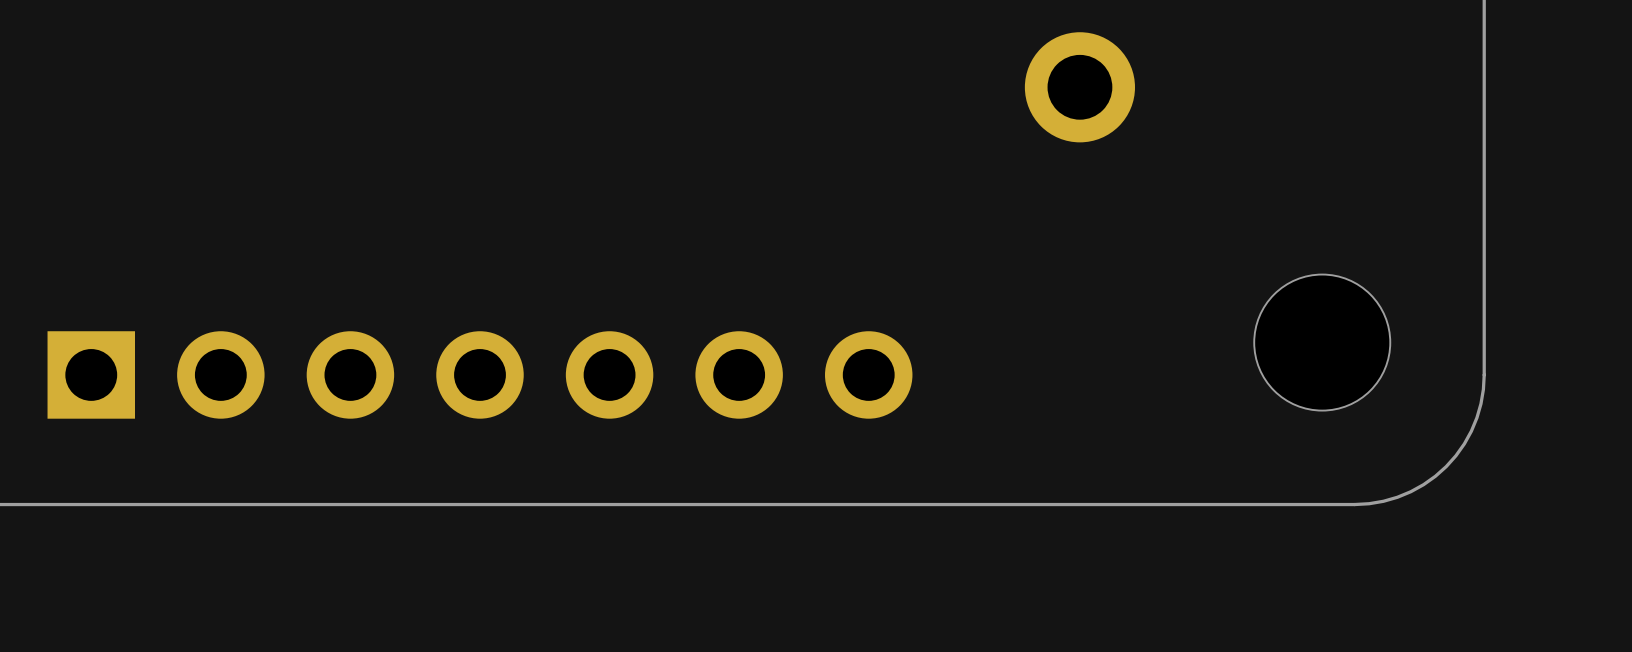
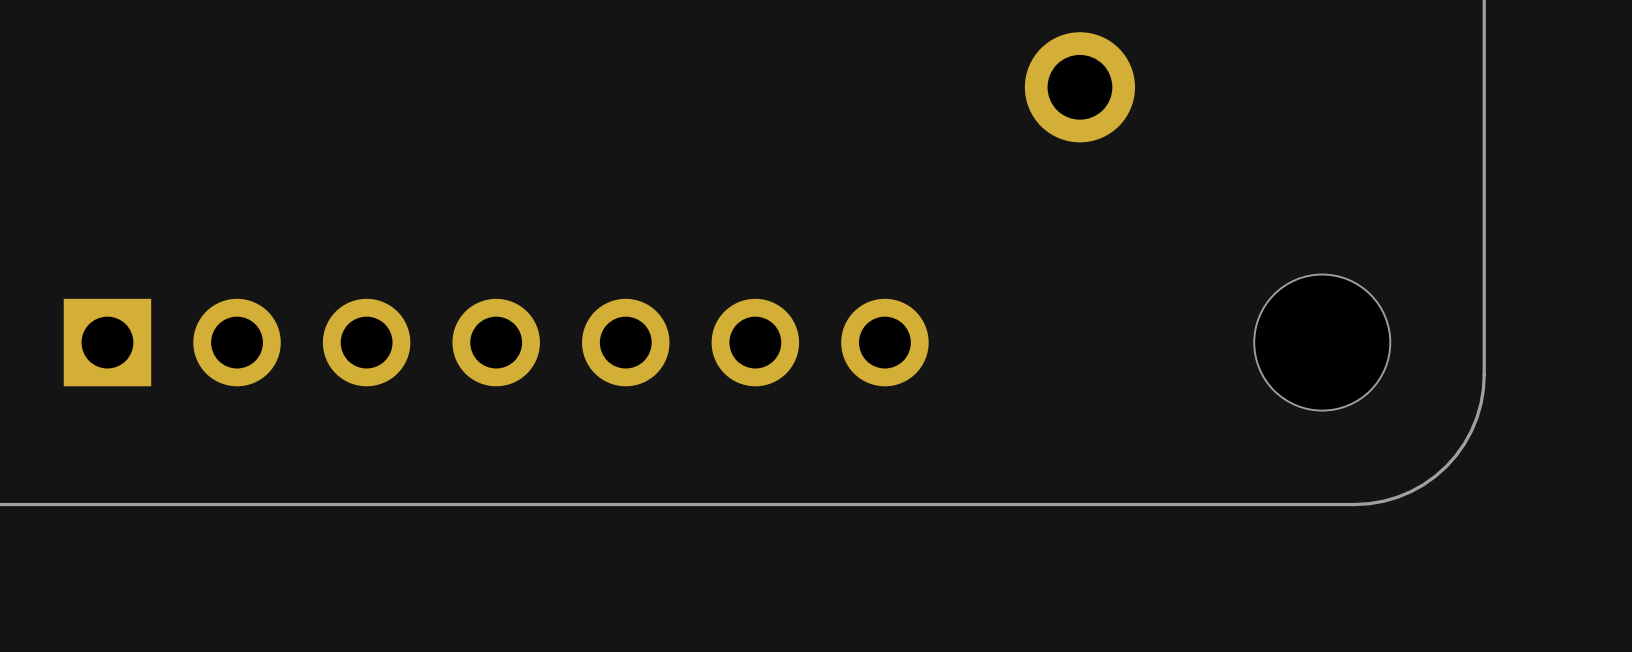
part position: (479, 374) -> (496, 342)

